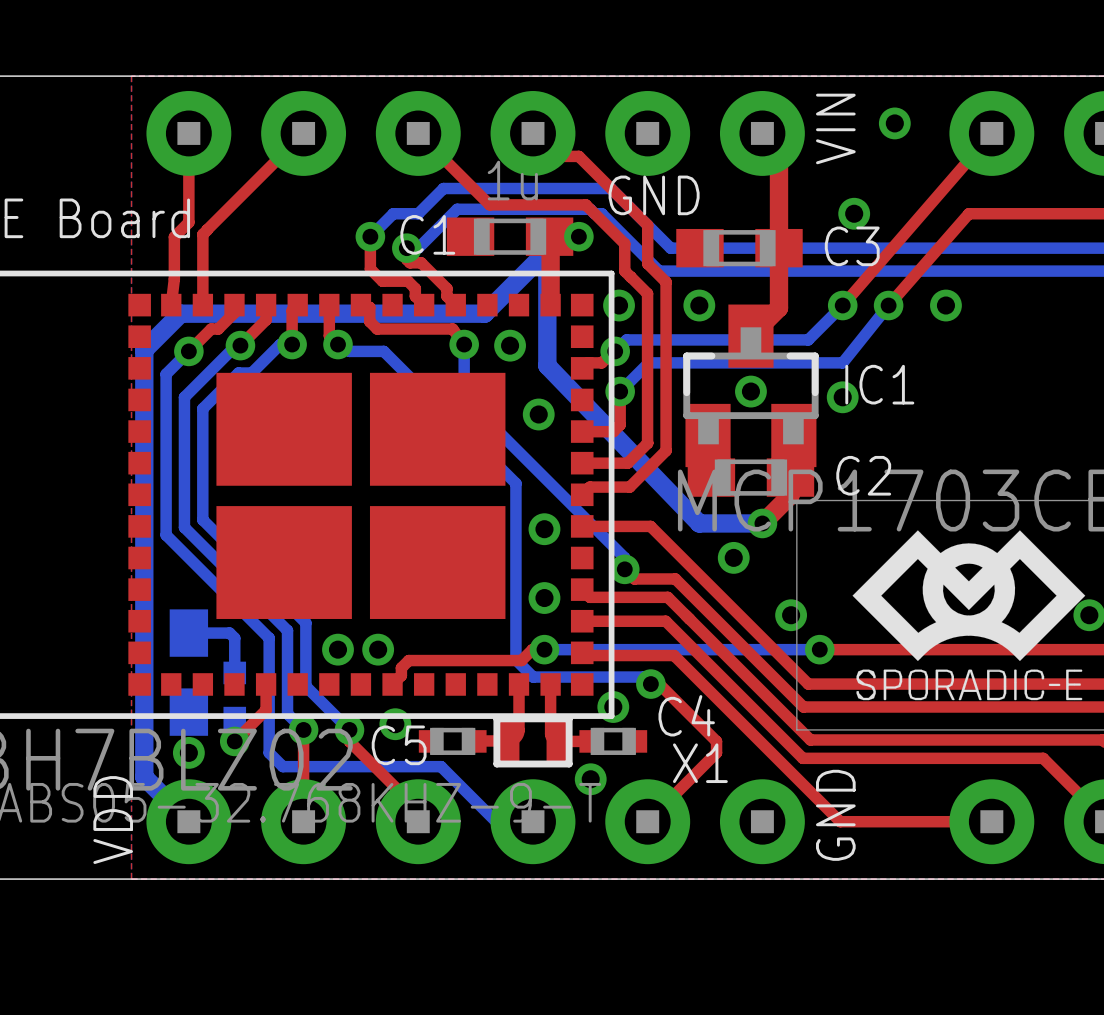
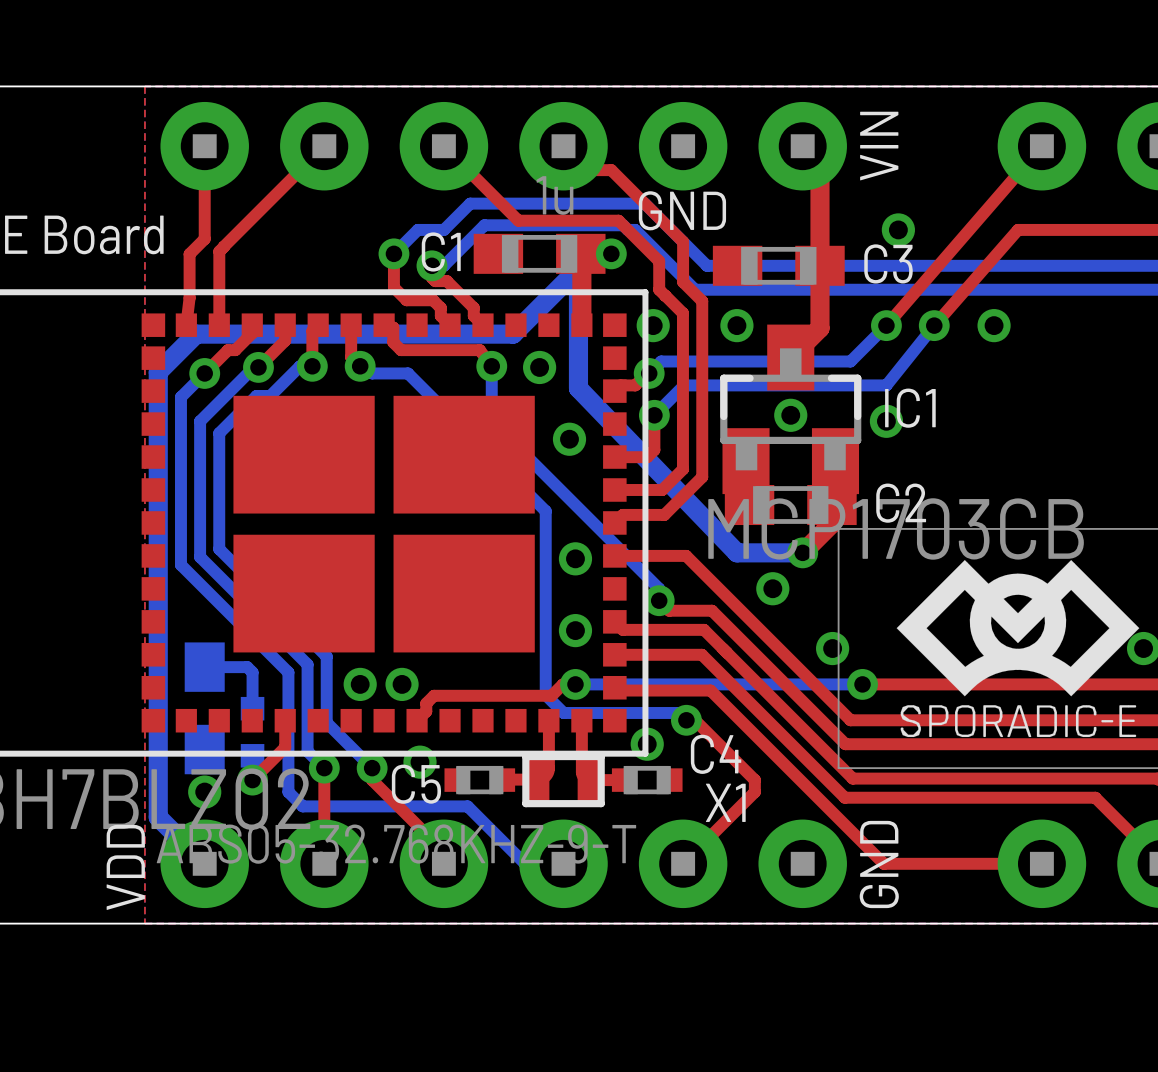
via: (894, 123) -> none
via: (590, 779) -> none

